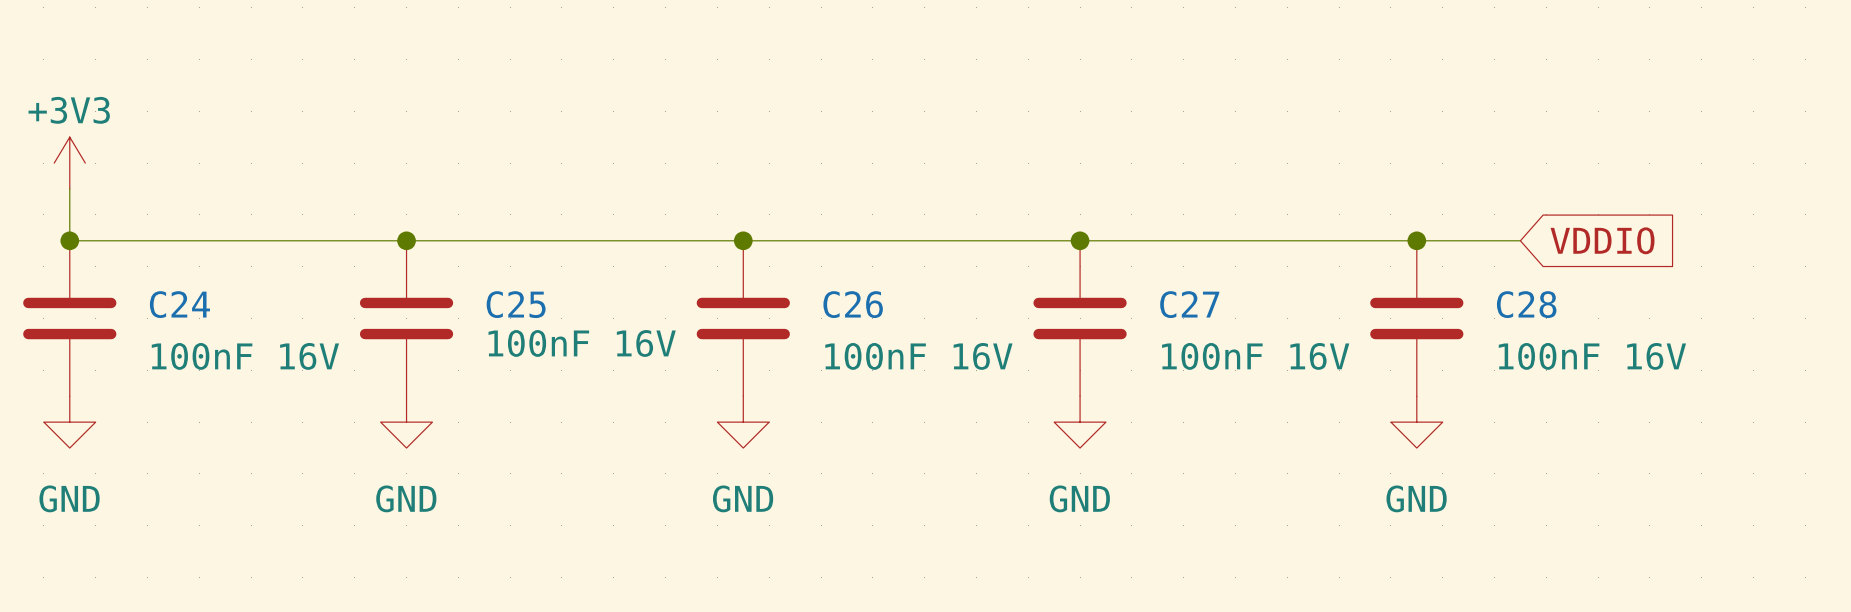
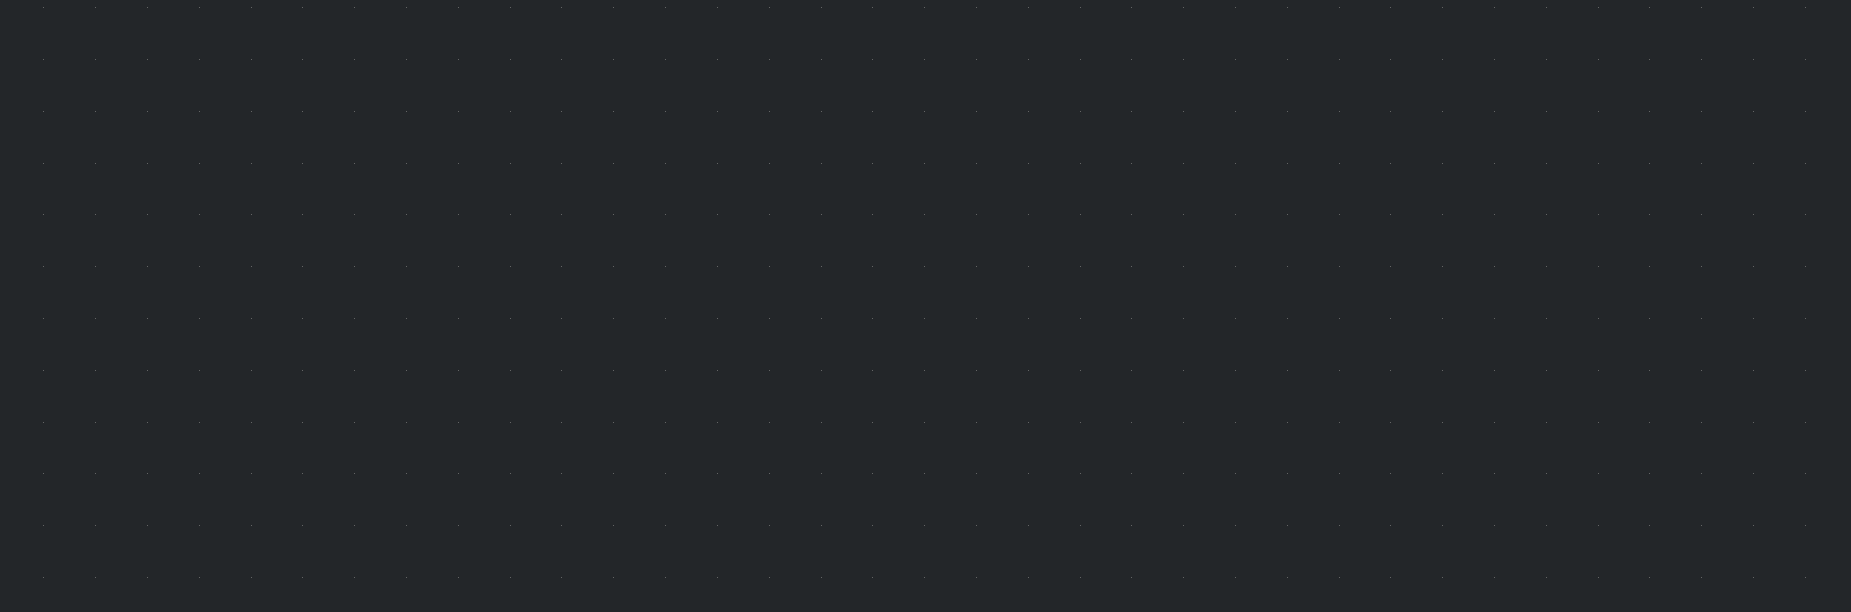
power symbol: +3V3 (69, 163) -> none
wire: (69, 188) (69, 240) (1520, 240) -> none
junction: (69, 240) -> none
junction: (406, 240) -> none
junction: (743, 240) -> none
junction: (1080, 240) -> none
junction: (1416, 240) -> none
global label: VDDIO (1602, 240) -> none
C24: 100nF 16V (69, 318) -> none
C25: 100nF 16V (406, 318) -> none
C26: 100nF 16V (743, 318) -> none
C27: 100nF 16V (1080, 318) -> none
C28: 100nF 16V (1416, 318) -> none
power symbol: GND (69, 422) -> none
power symbol: GND (406, 422) -> none
power symbol: GND (743, 422) -> none
power symbol: GND (1080, 422) -> none
power symbol: GND (1416, 422) -> none

